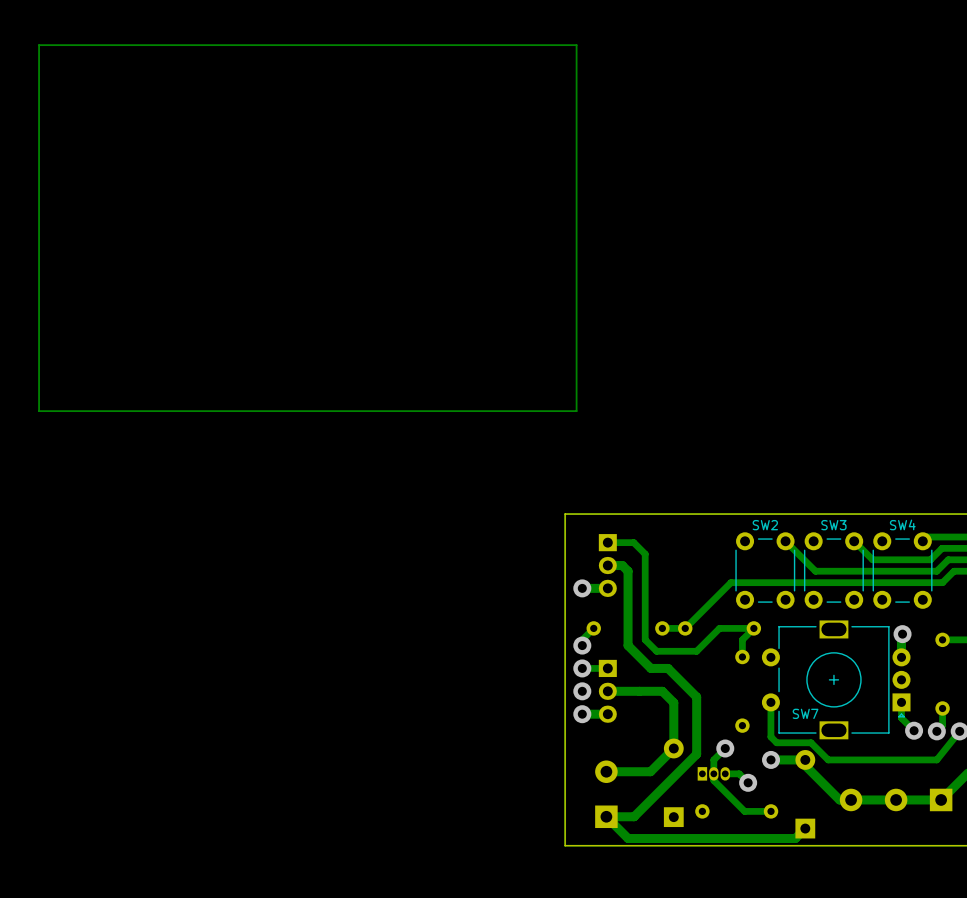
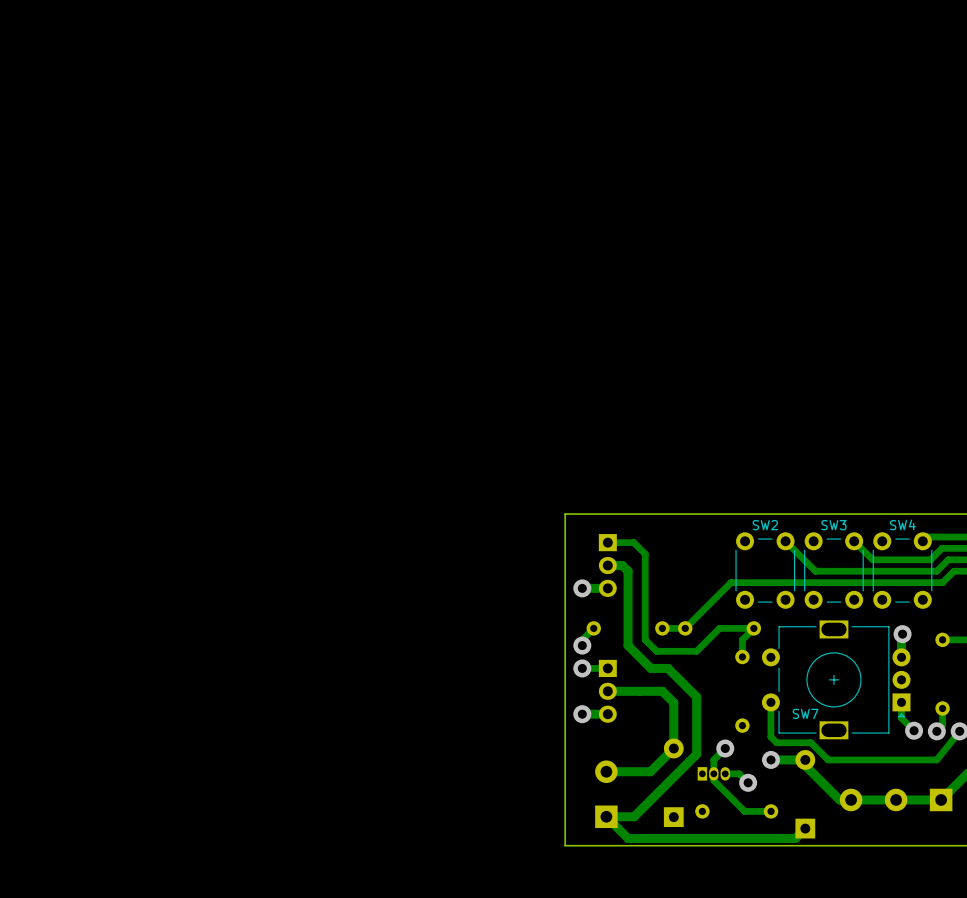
track: (576, 45) (39, 45) (39, 411) (576, 411) (576, 45) -> none
via: (582, 691) -> none

